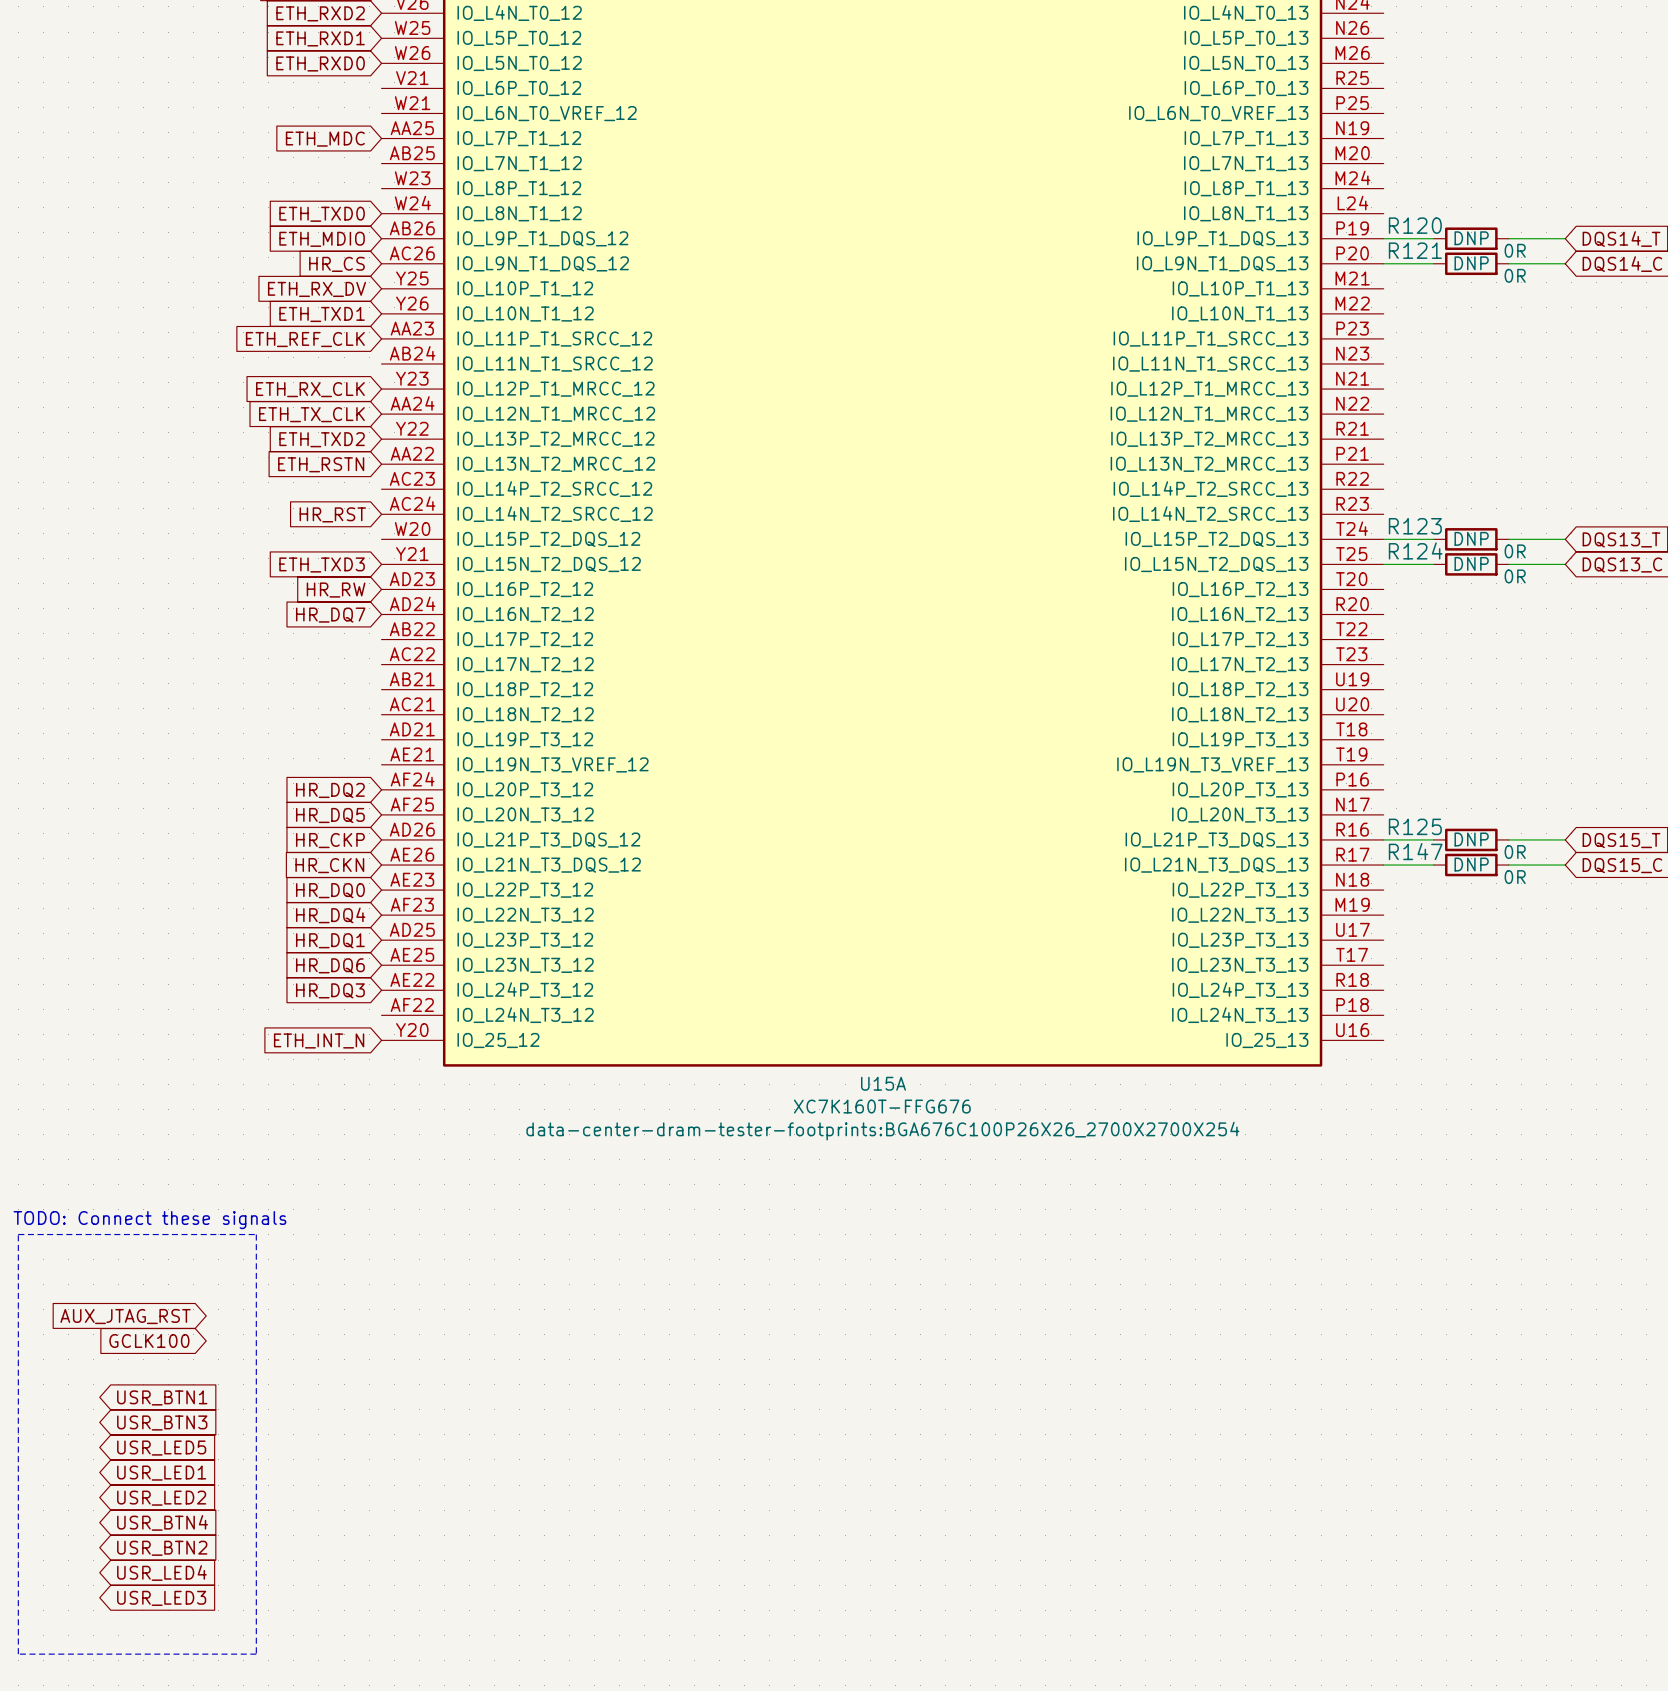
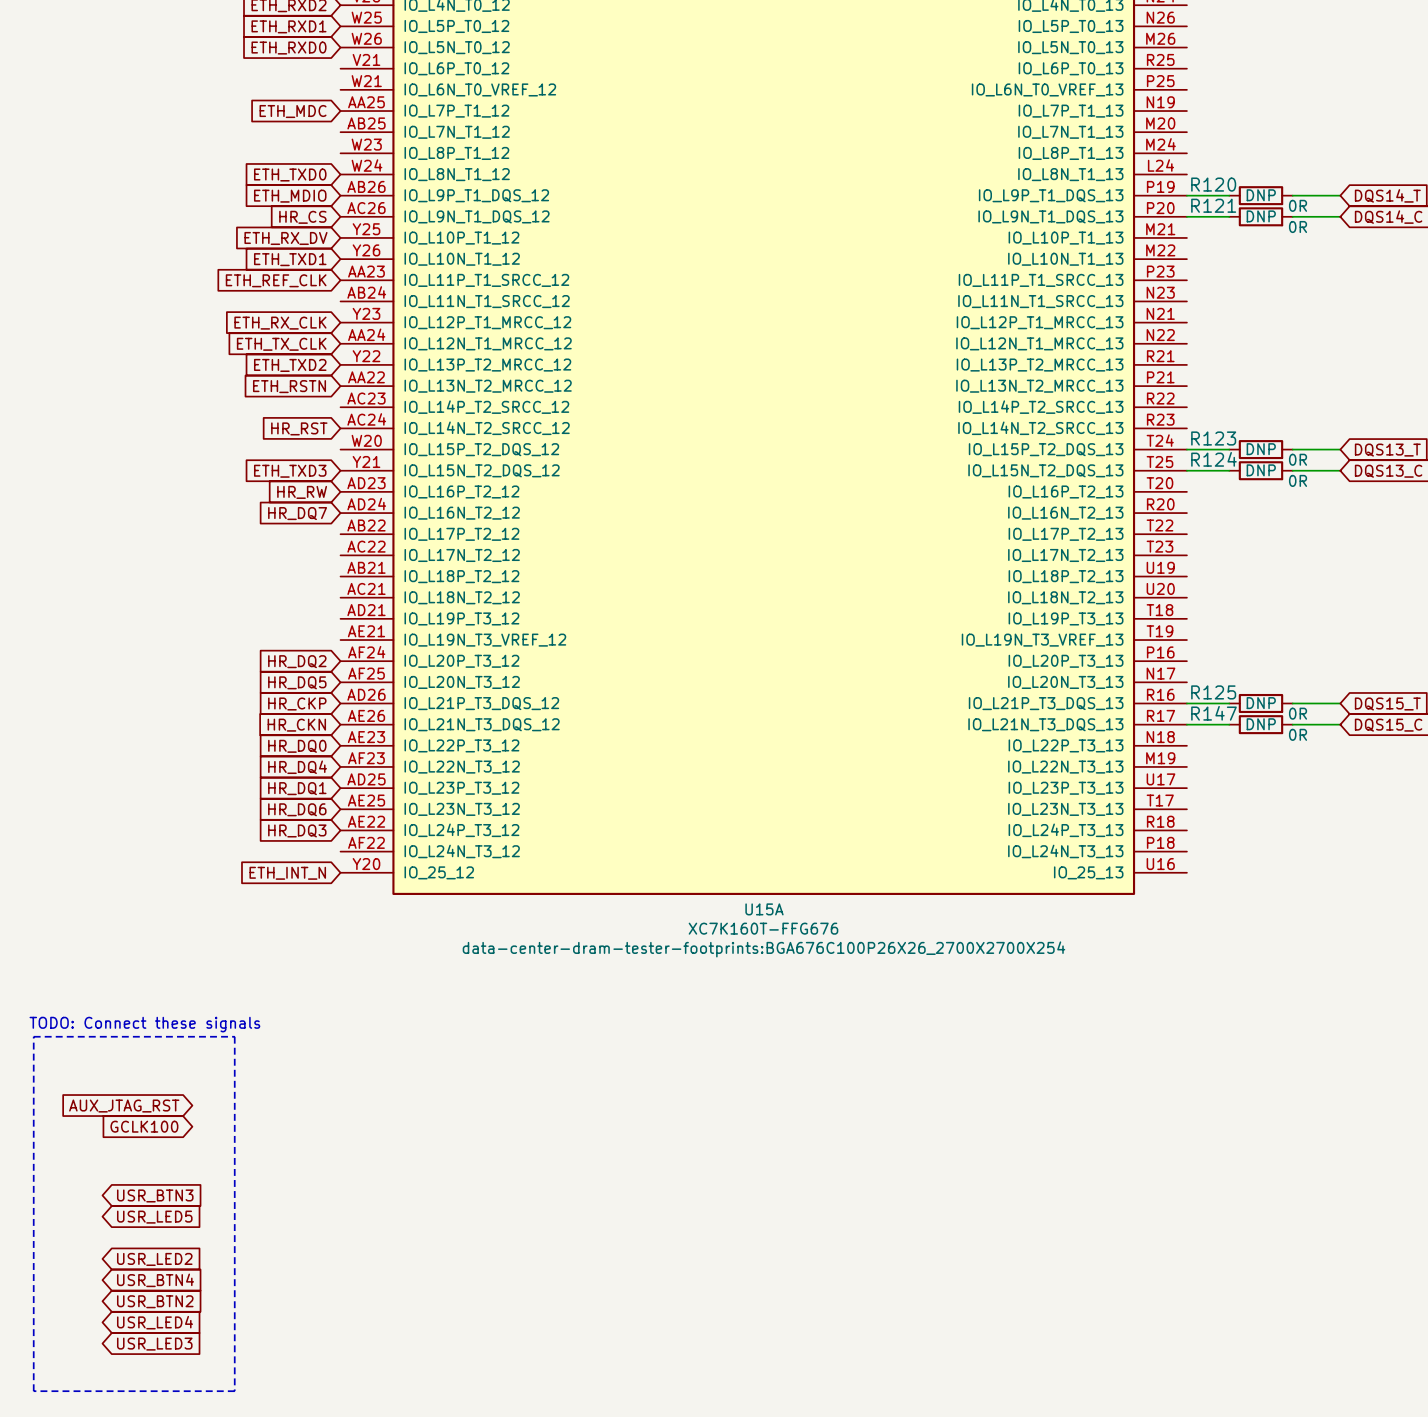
global label: USR_BTN1 (162, 1397) -> none
global label: USR_LED1 (161, 1473) -> none

